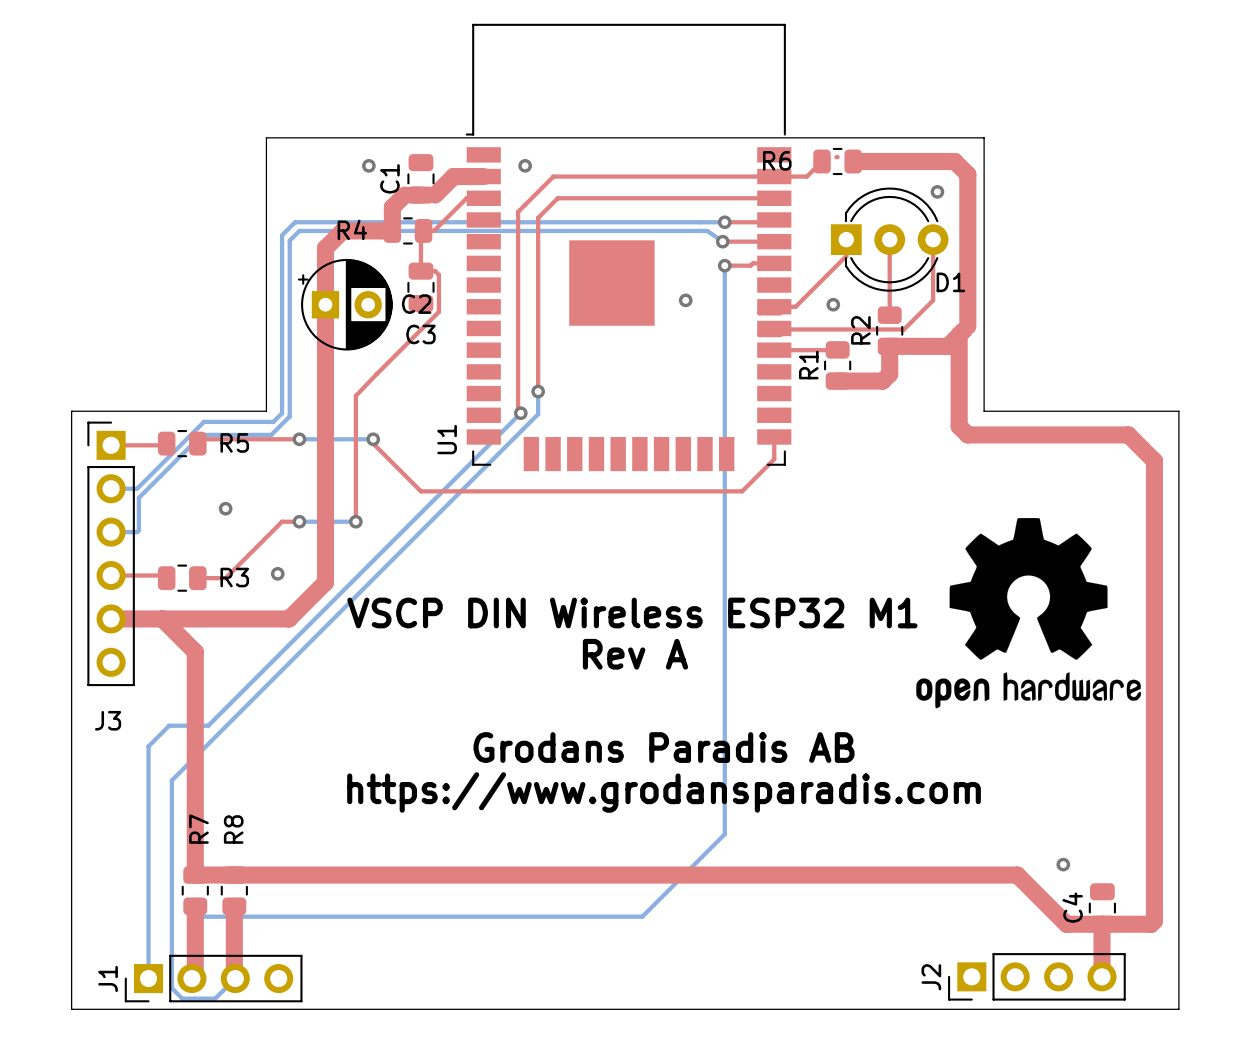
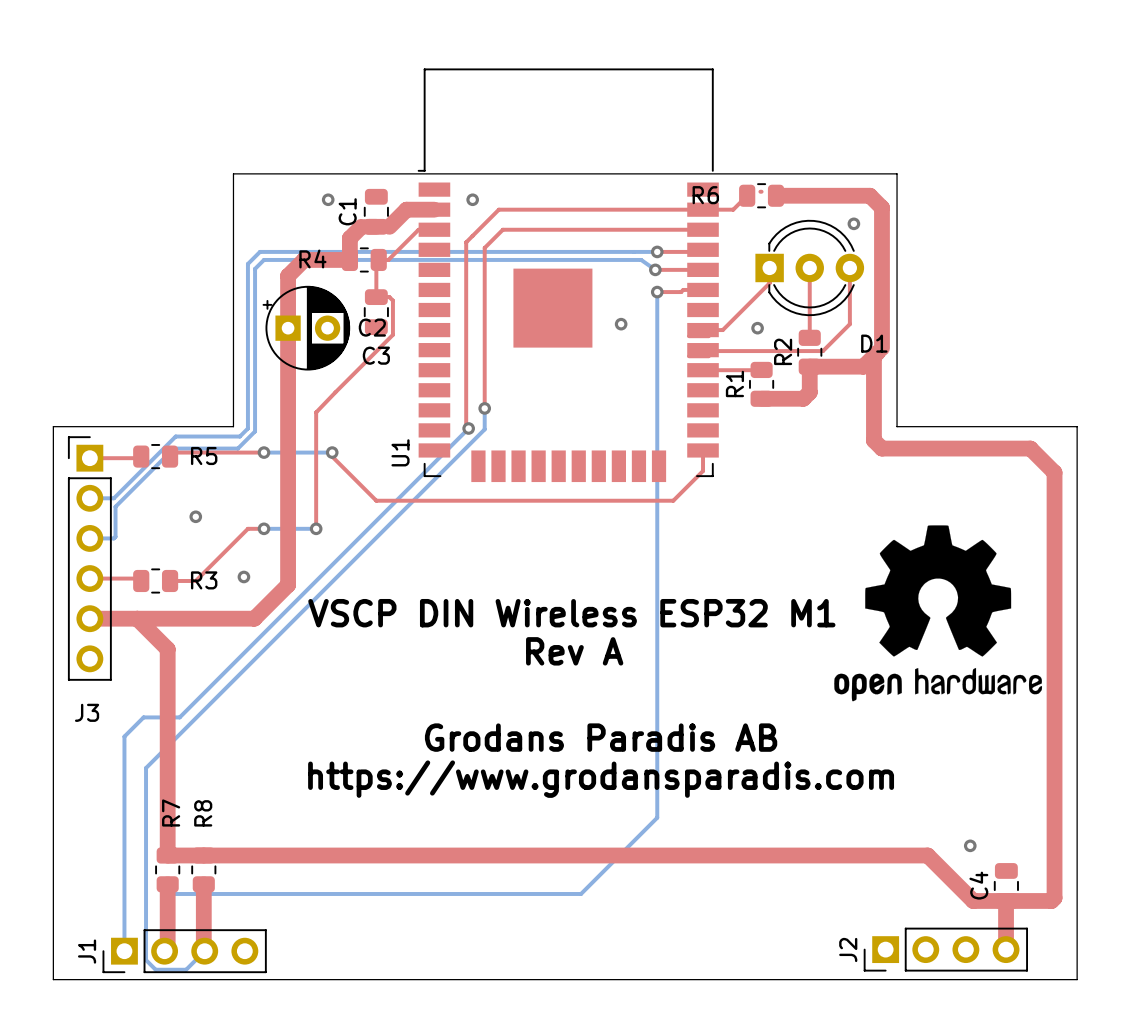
D1 name position: D1 (950, 282) -> D1 (874, 343)

